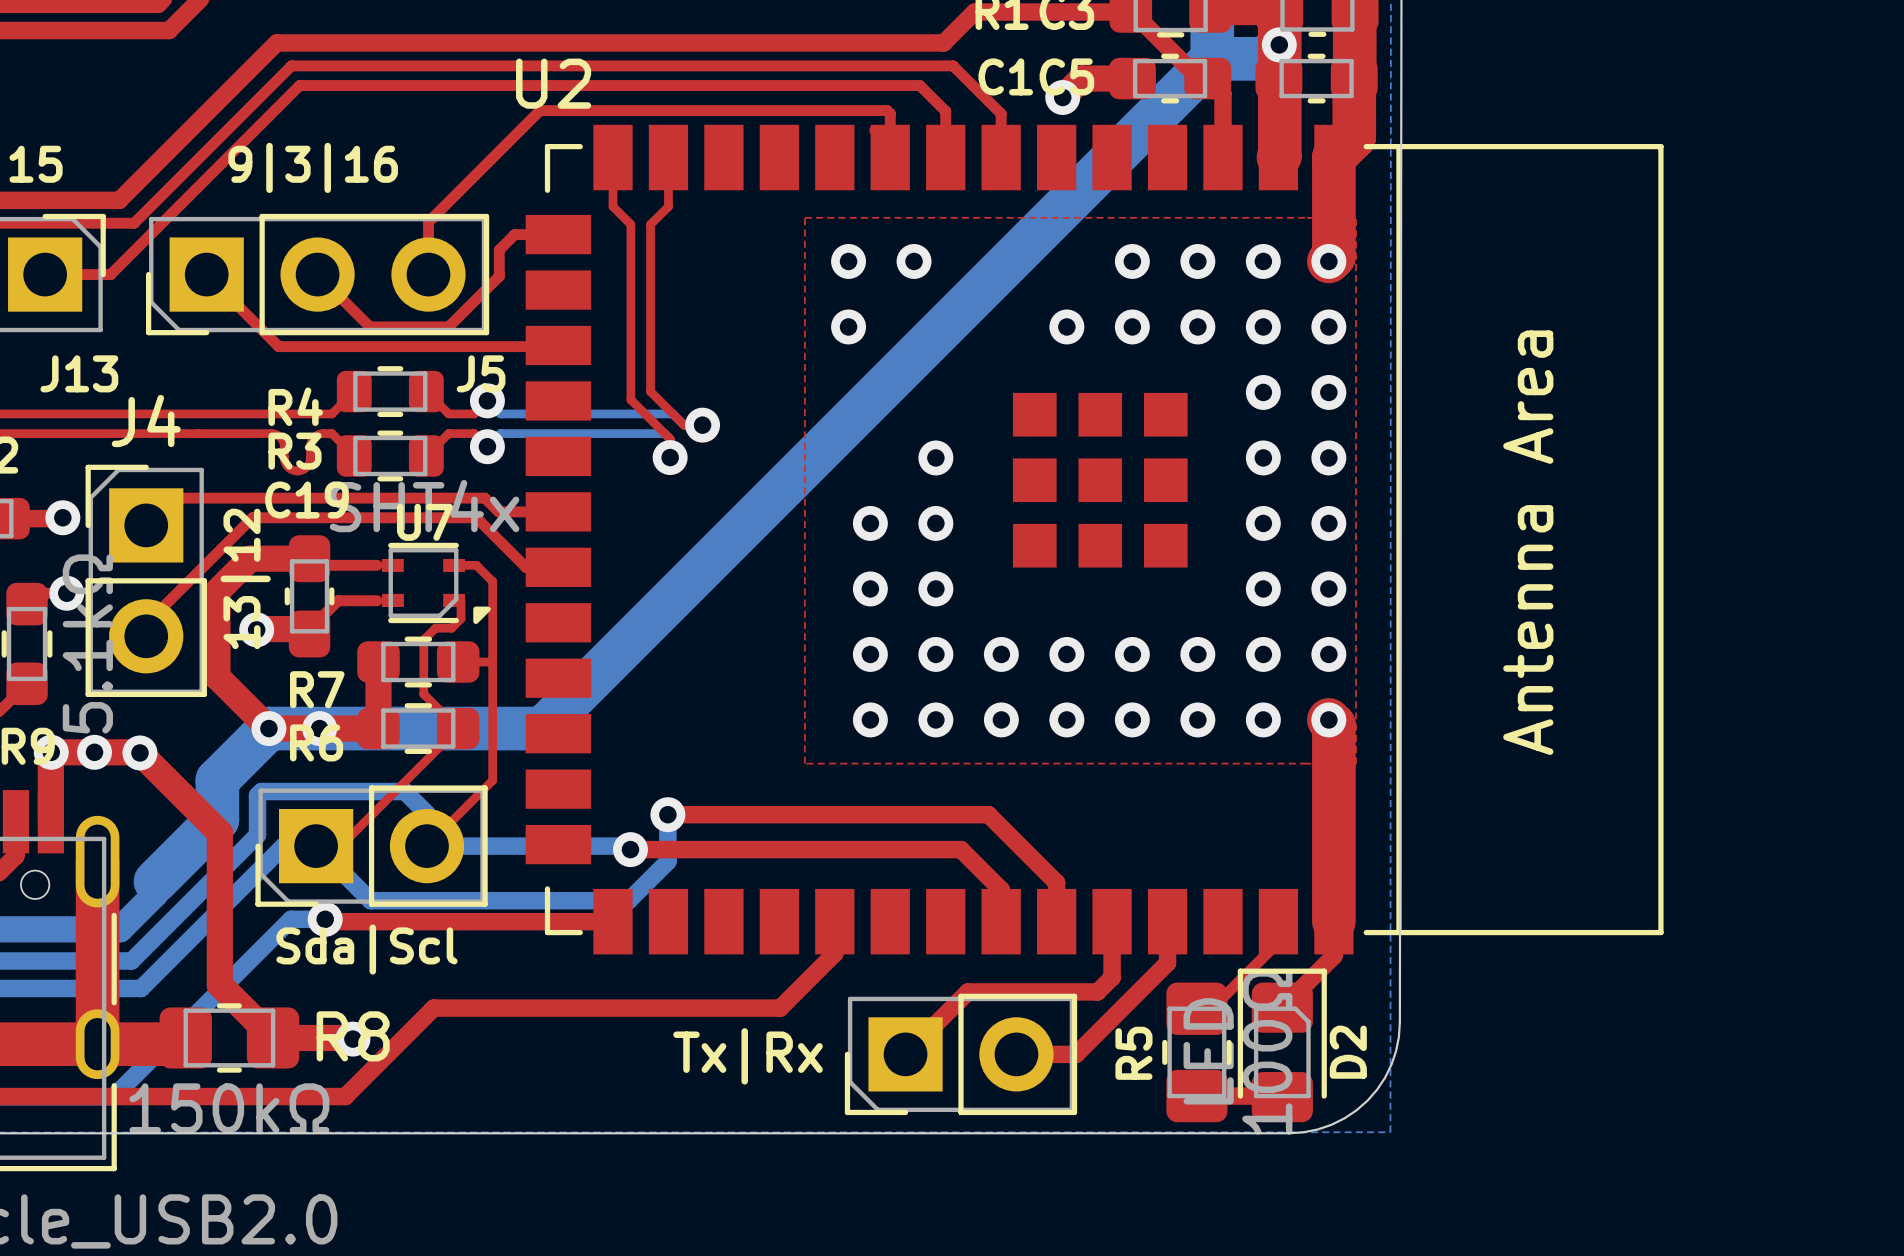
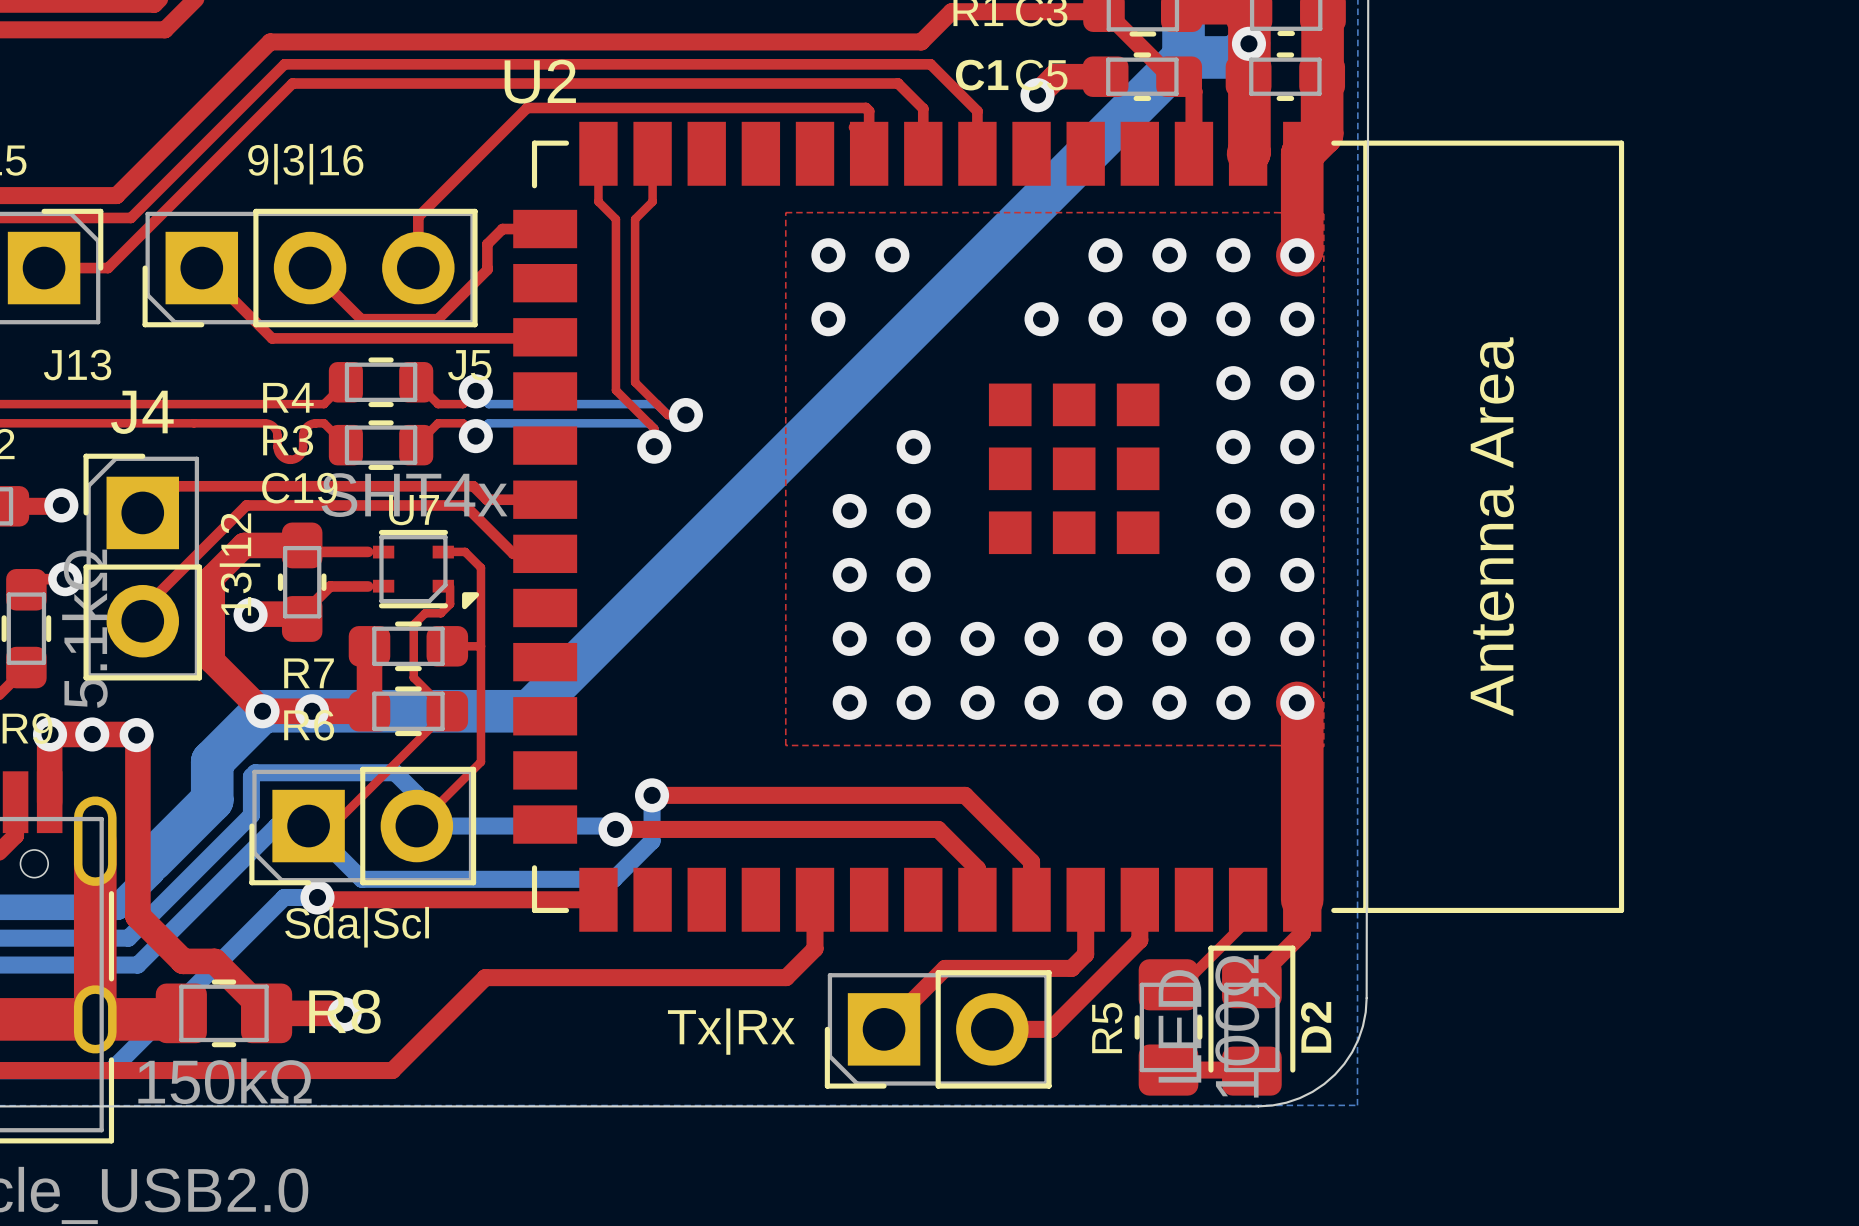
top track: (141, 754) (219, 832) (219, 984) -> (137, 736) (137, 916) (183, 961) (214, 961)
top track: (834, 953) (780, 1008) (433, 1008) (345, 1096) -> (815, 930) (815, 948) (786, 977) (485, 977) (392, 1070) (337, 1070)

